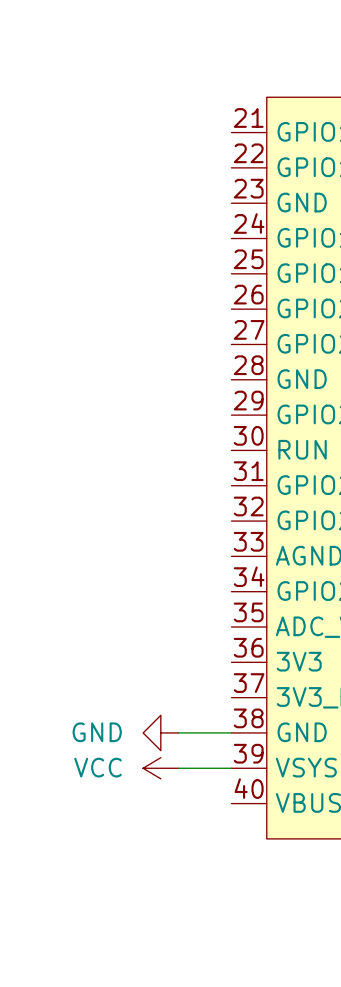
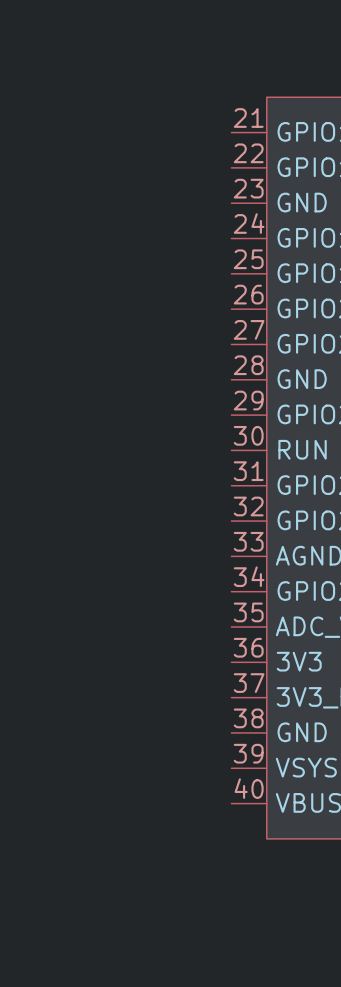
power symbol: GND (160, 732) -> none
wire: (178, 732) (231, 732) -> none
power symbol: VCC (160, 768) -> none
wire: (178, 768) (231, 768) -> none

